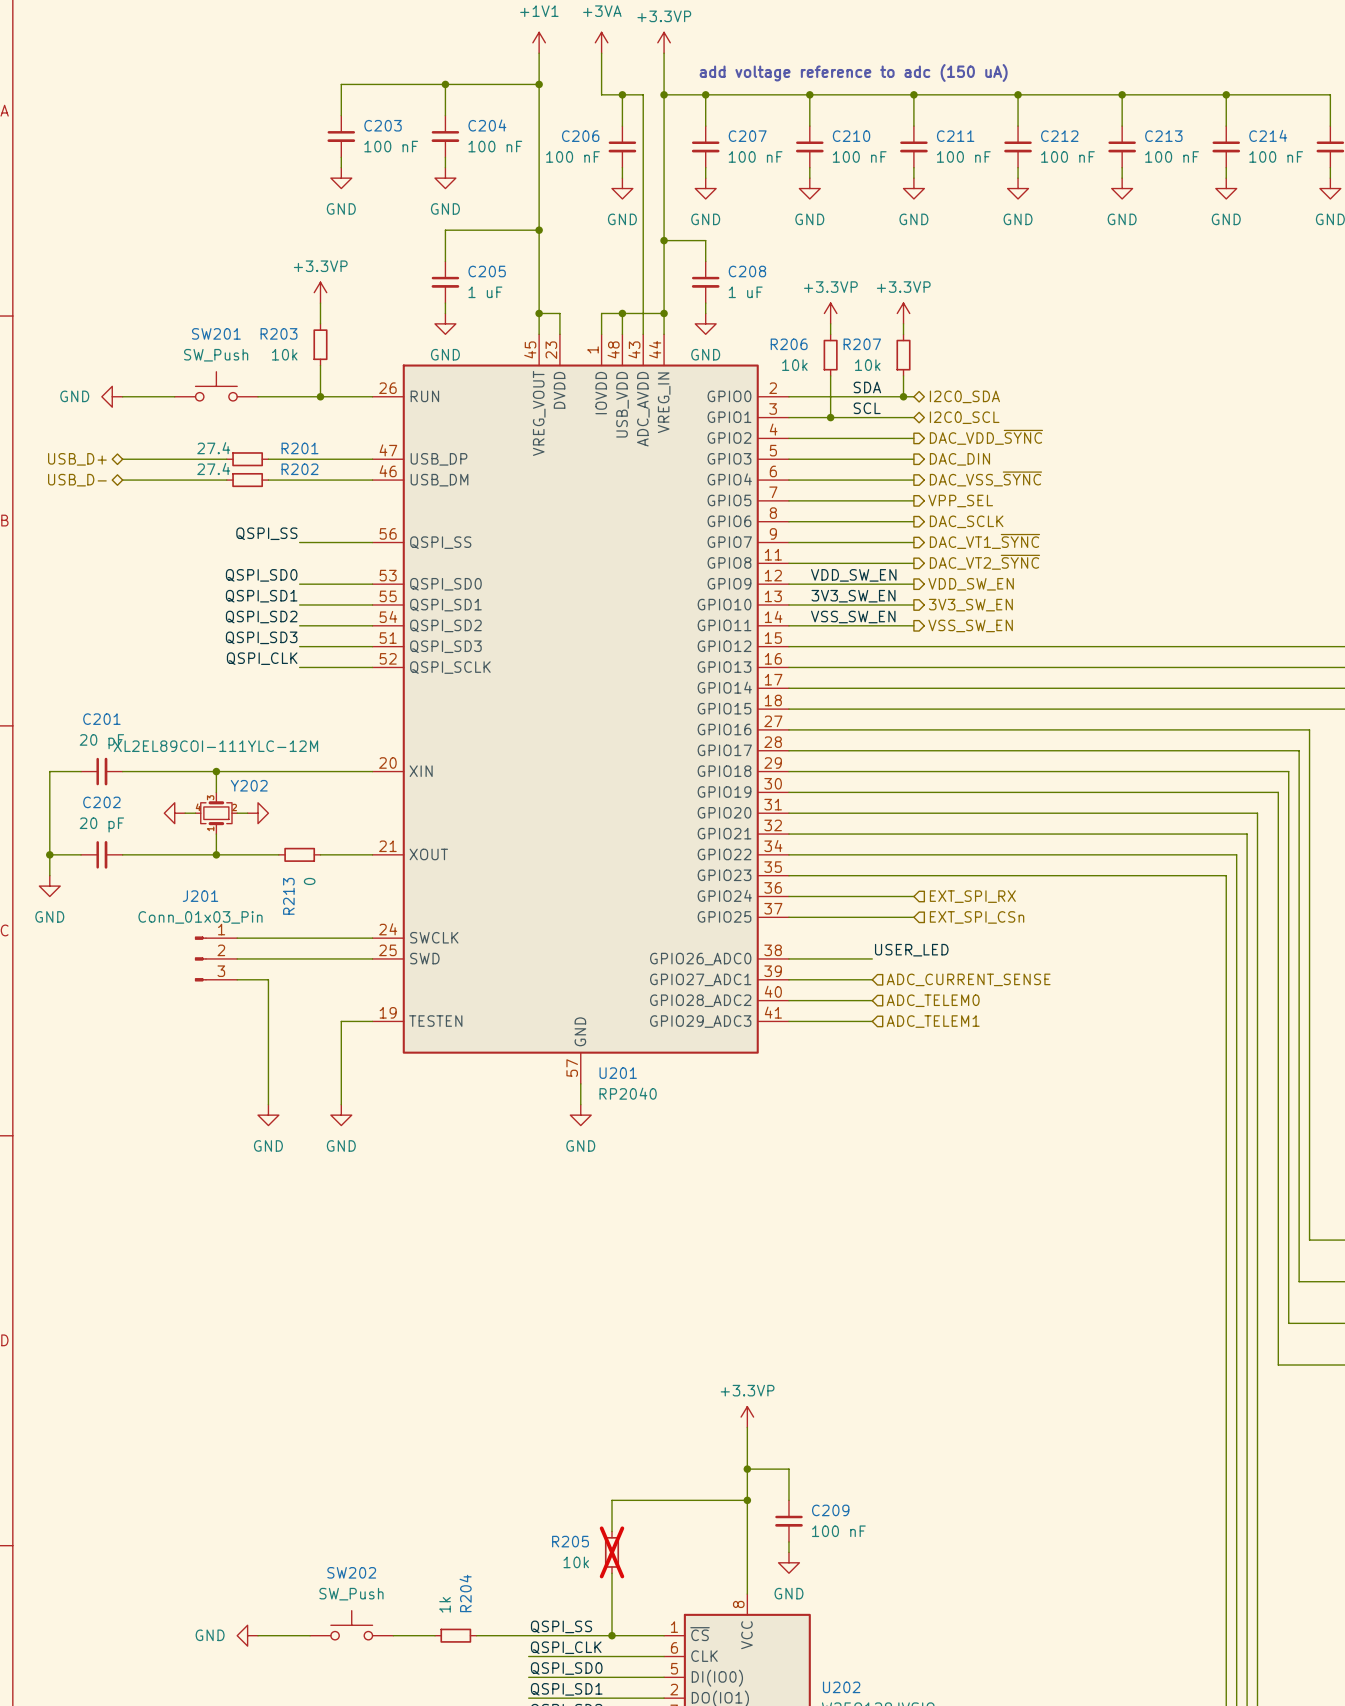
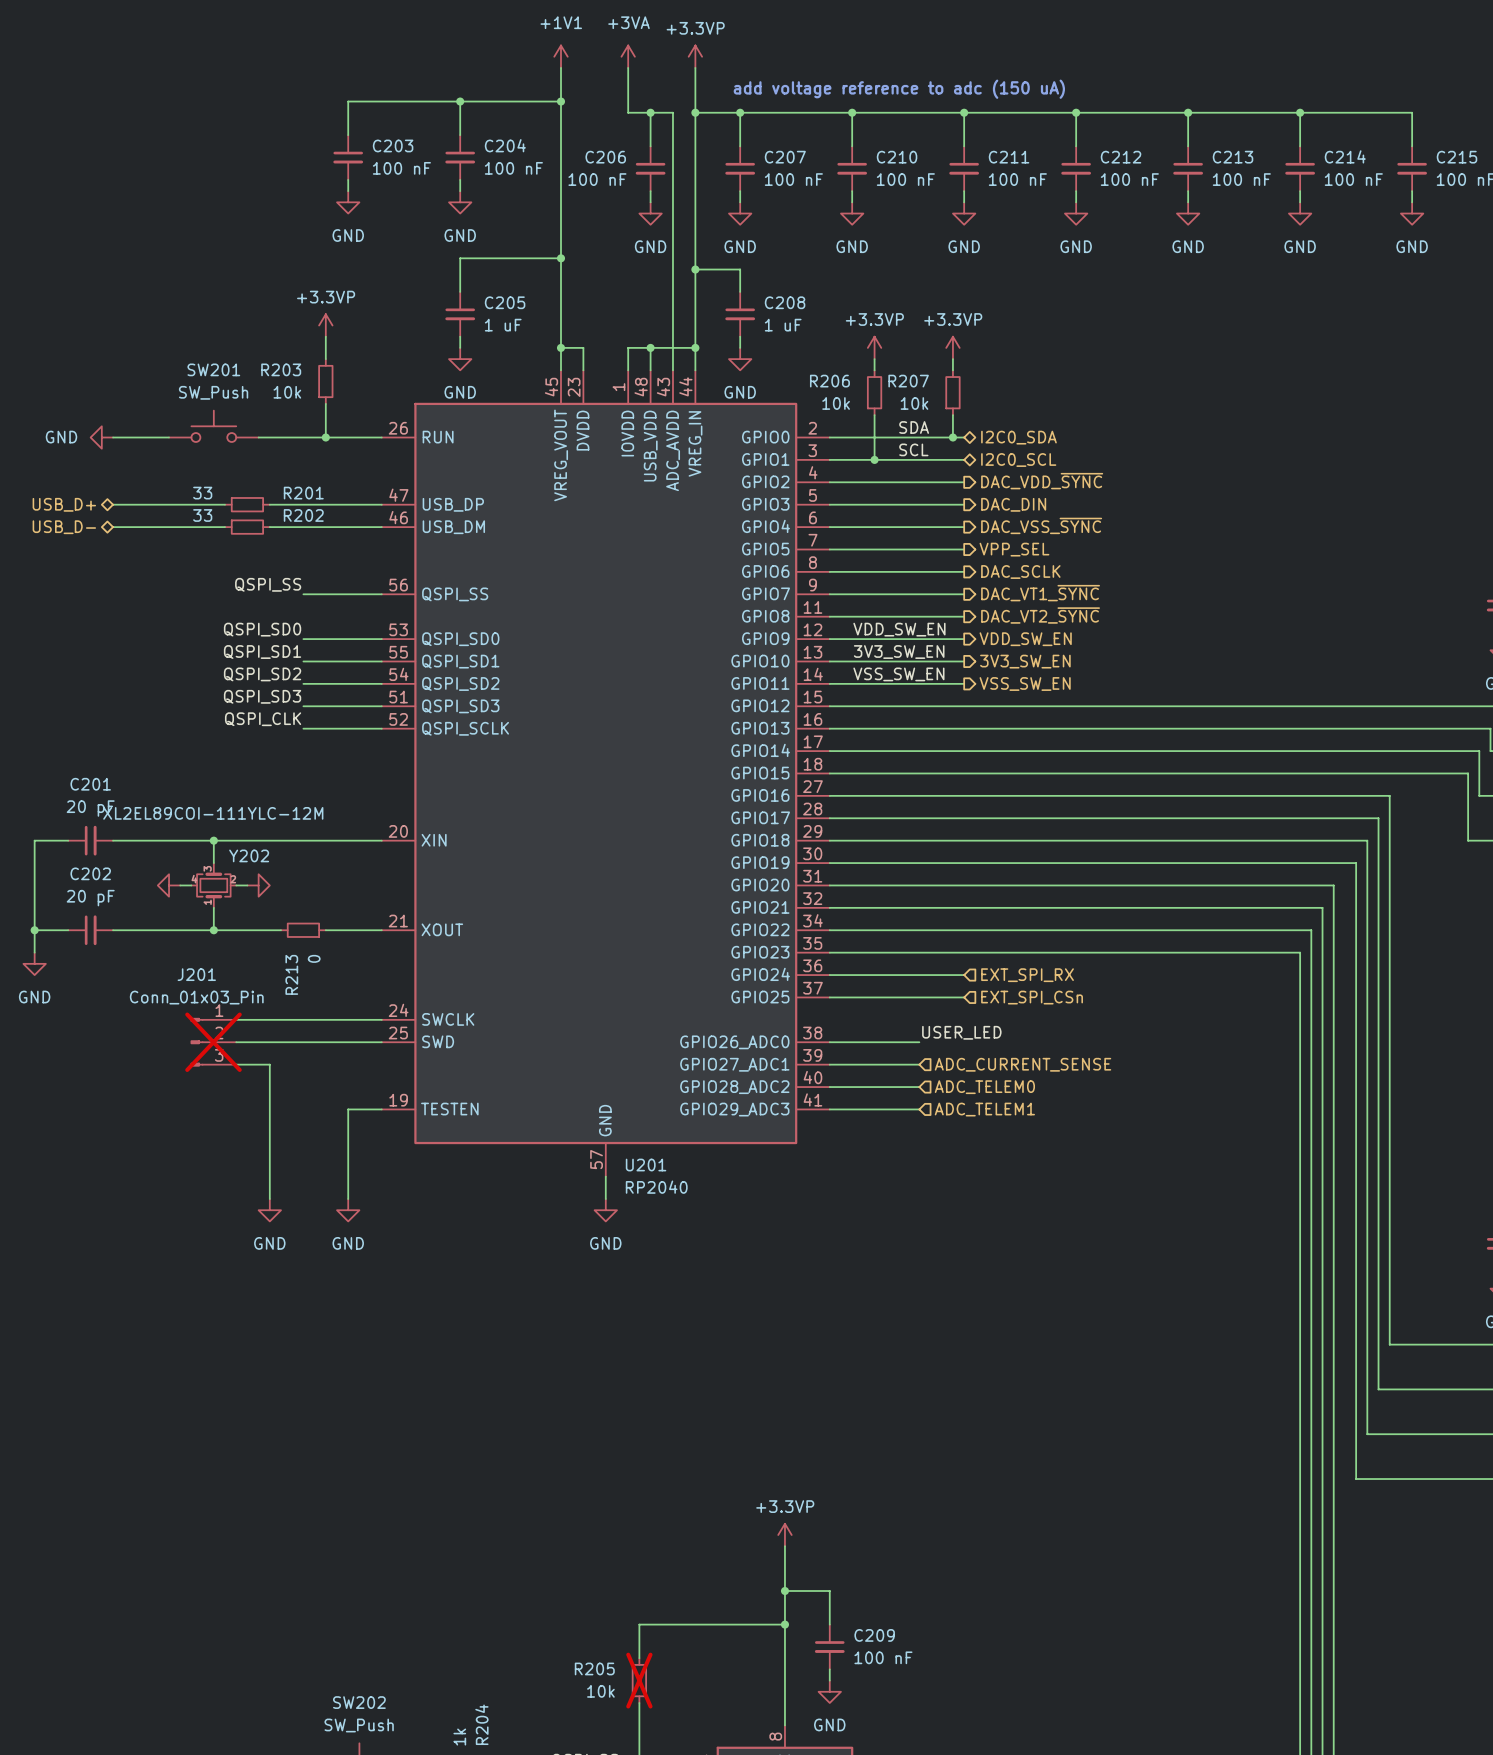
R201 value: 27.4 (213, 448) -> 33 (202, 493)
R202 value: 27.4 (213, 469) -> 33 (202, 515)
J201 do-not-place cross: none -> (213, 1042)

